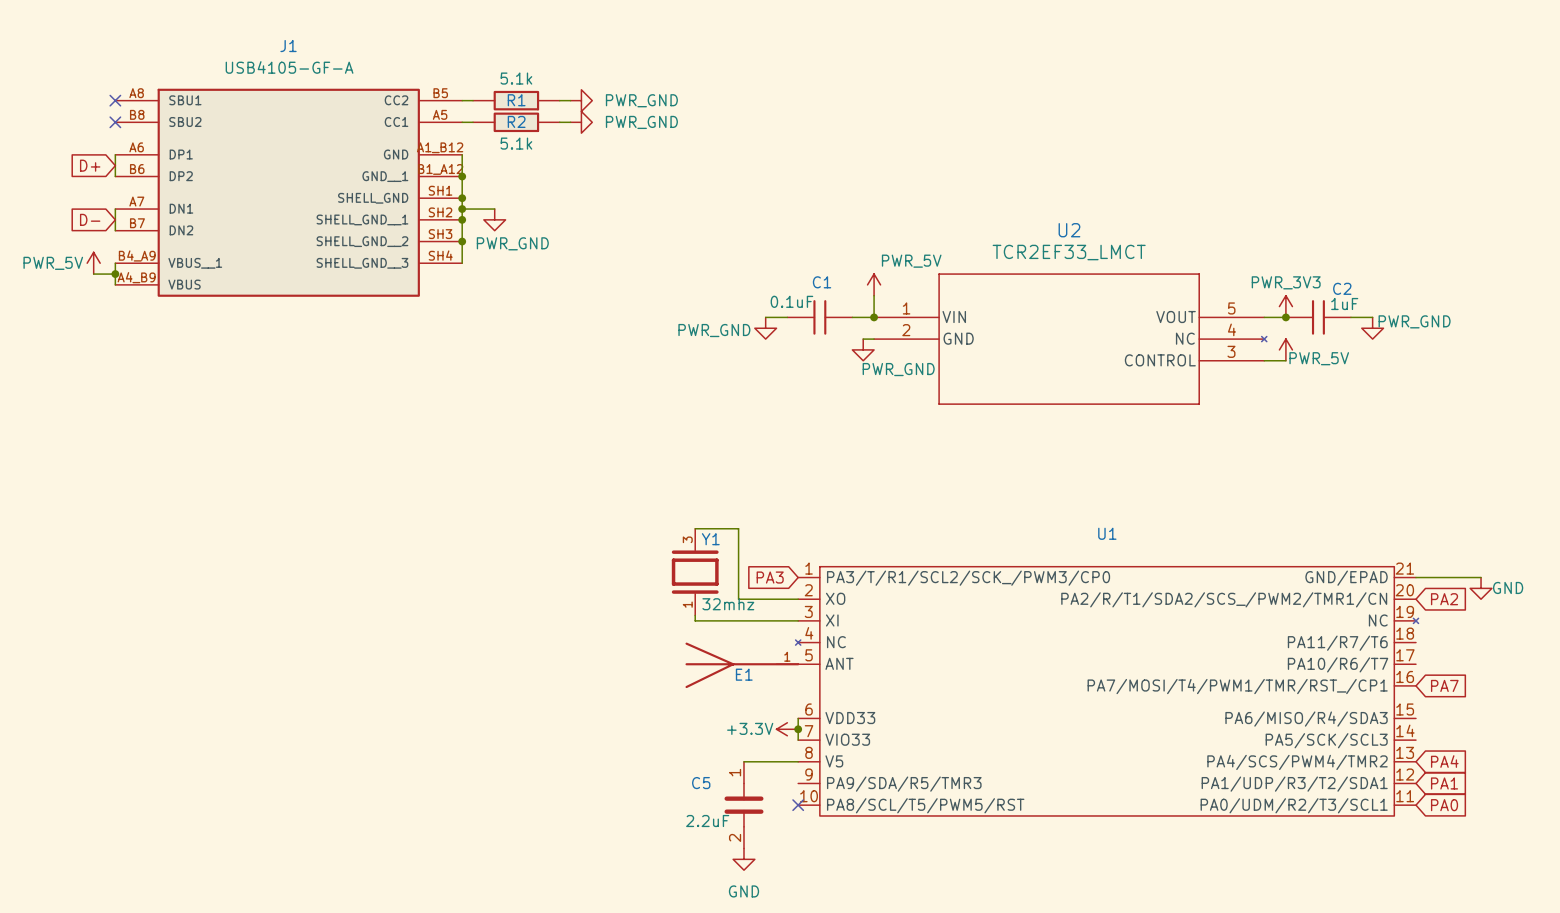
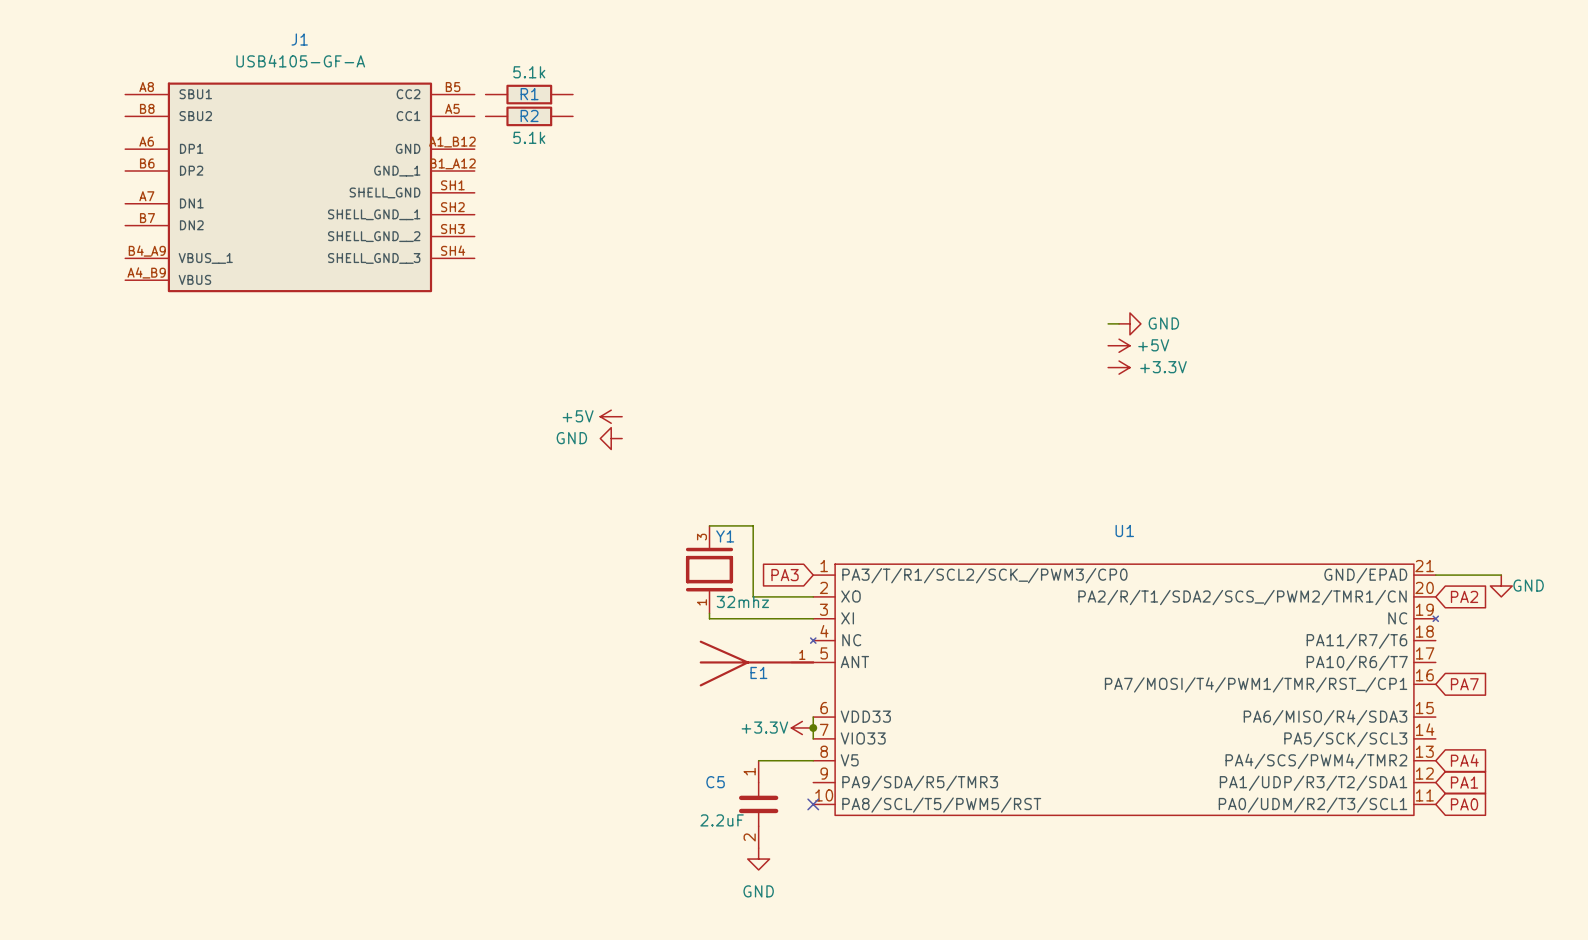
no-connect mark: (115, 100) -> none
wire: (462, 100) (473, 100) -> none
wire: (559, 100) (570, 100) -> none
power symbol: PWR_GND (581, 100) -> none
no-connect mark: (115, 122) -> none
wire: (462, 122) (473, 122) -> none
wire: (559, 122) (570, 122) -> none
power symbol: PWR_GND (581, 122) -> none
wire: (115, 154) (115, 176) -> none
wire: (462, 154) (462, 263) -> none
global label: D+ (90, 165) -> none
junction: (462, 176) -> none
junction: (462, 198) -> none
wire: (115, 209) (115, 230) -> none
wire: (462, 209) (494, 209) -> none
junction: (462, 209) -> none
global label: D- (90, 219) -> none
junction: (462, 219) -> none
power symbol: PWR_GND (494, 219) -> none
junction: (462, 241) -> none
power symbol: PWR_5V (93, 263) -> none
wire: (115, 263) (115, 284) -> none
wire: (93, 274) (115, 274) -> none
junction: (115, 274) -> none
power symbol: PWR_5V (874, 284) -> none
wire: (874, 295) (874, 317) (852, 317) -> none
power symbol: PWR_3V3 (1285, 306) -> none
wire: (765, 317) (787, 317) -> none
C1: 0.1uF (819, 317) -> none
junction: (874, 317) -> none
wire: (1264, 317) (1285, 317) -> none
junction: (1285, 317) -> none
C2: 1uF (1318, 317) -> none
wire: (1350, 317) (1372, 317) -> none
power symbol: PWR_GND (765, 328) -> none
wire: none -> (1108, 323) (1119, 323)
power symbol: none -> GND (1129, 323)
power symbol: PWR_GND (1372, 328) -> none
wire: (863, 339) (874, 339) -> none
U2: TCR2EF33_LMCT (1070, 339) -> none
power symbol: PWR_GND (863, 349) -> none
power symbol: none -> +5V (1119, 345)
power symbol: PWR_5V (1285, 349) -> none
wire: (1264, 360) (1285, 360) -> none
power symbol: none -> +3.3V (1119, 367)
power symbol: none -> +5V (611, 416)
power symbol: none -> GND (611, 438)

